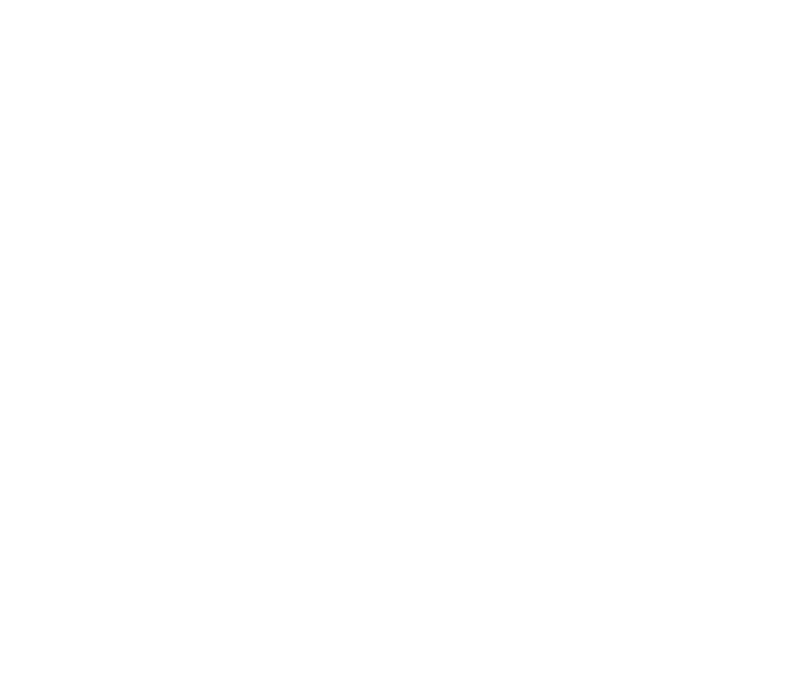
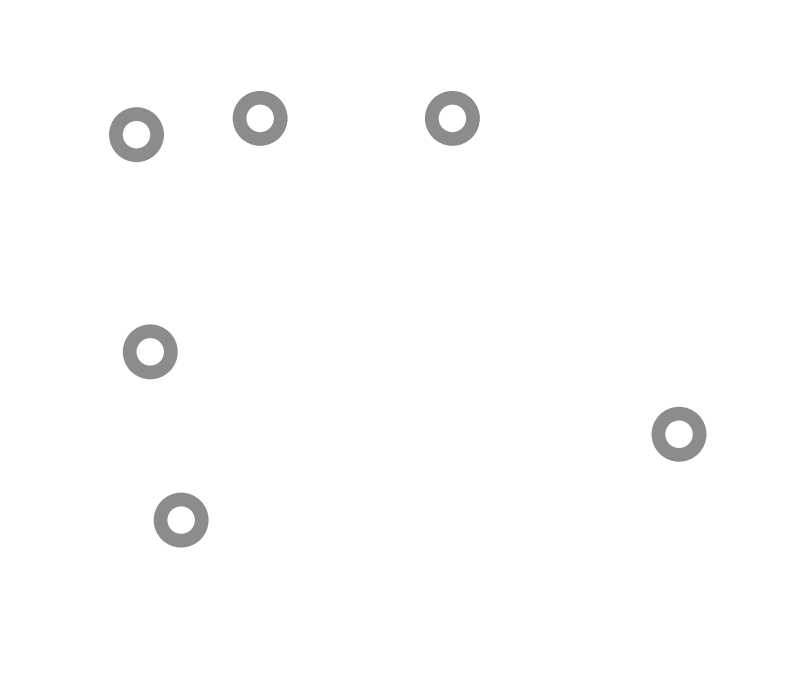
via: none -> (260, 118)
via: none -> (452, 118)
via: none -> (136, 134)
via: none -> (150, 351)
via: none -> (679, 434)
via: none -> (181, 520)

